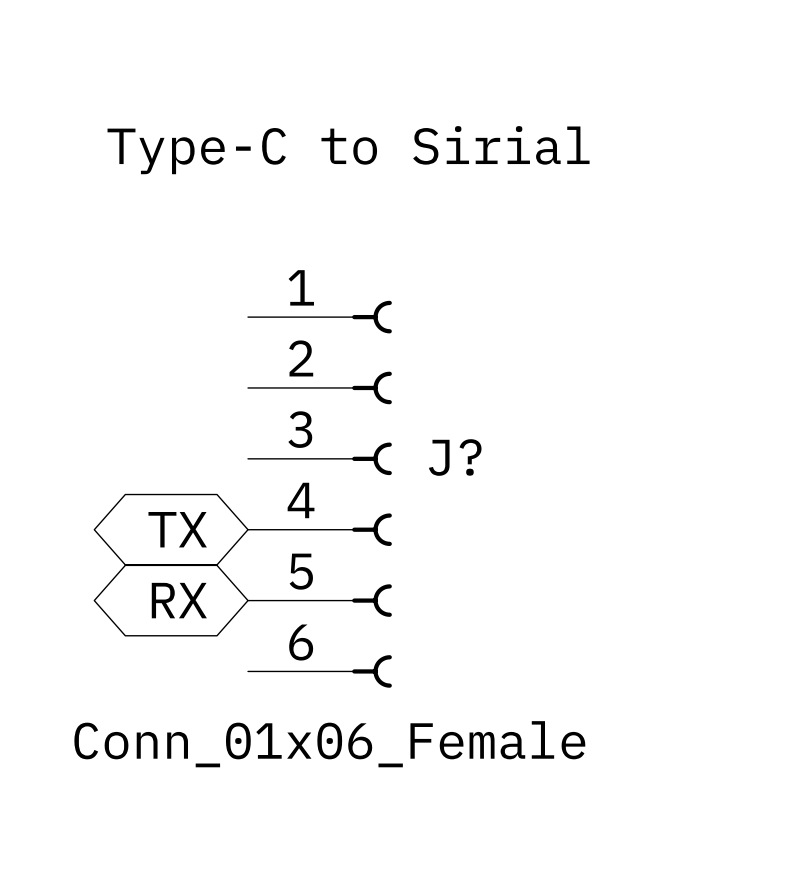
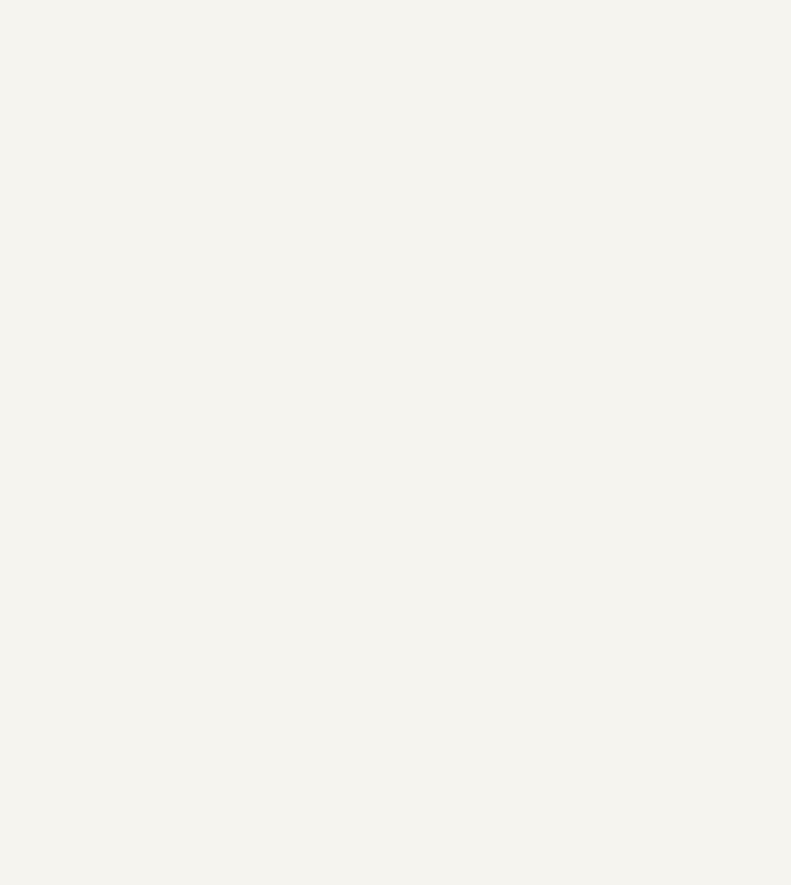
text: Type-C to Sirial (348, 150) -> none
J?: Conn_01x06_Female (319, 494) -> none
global label: TX (177, 529) -> none
global label: RX (179, 600) -> none

